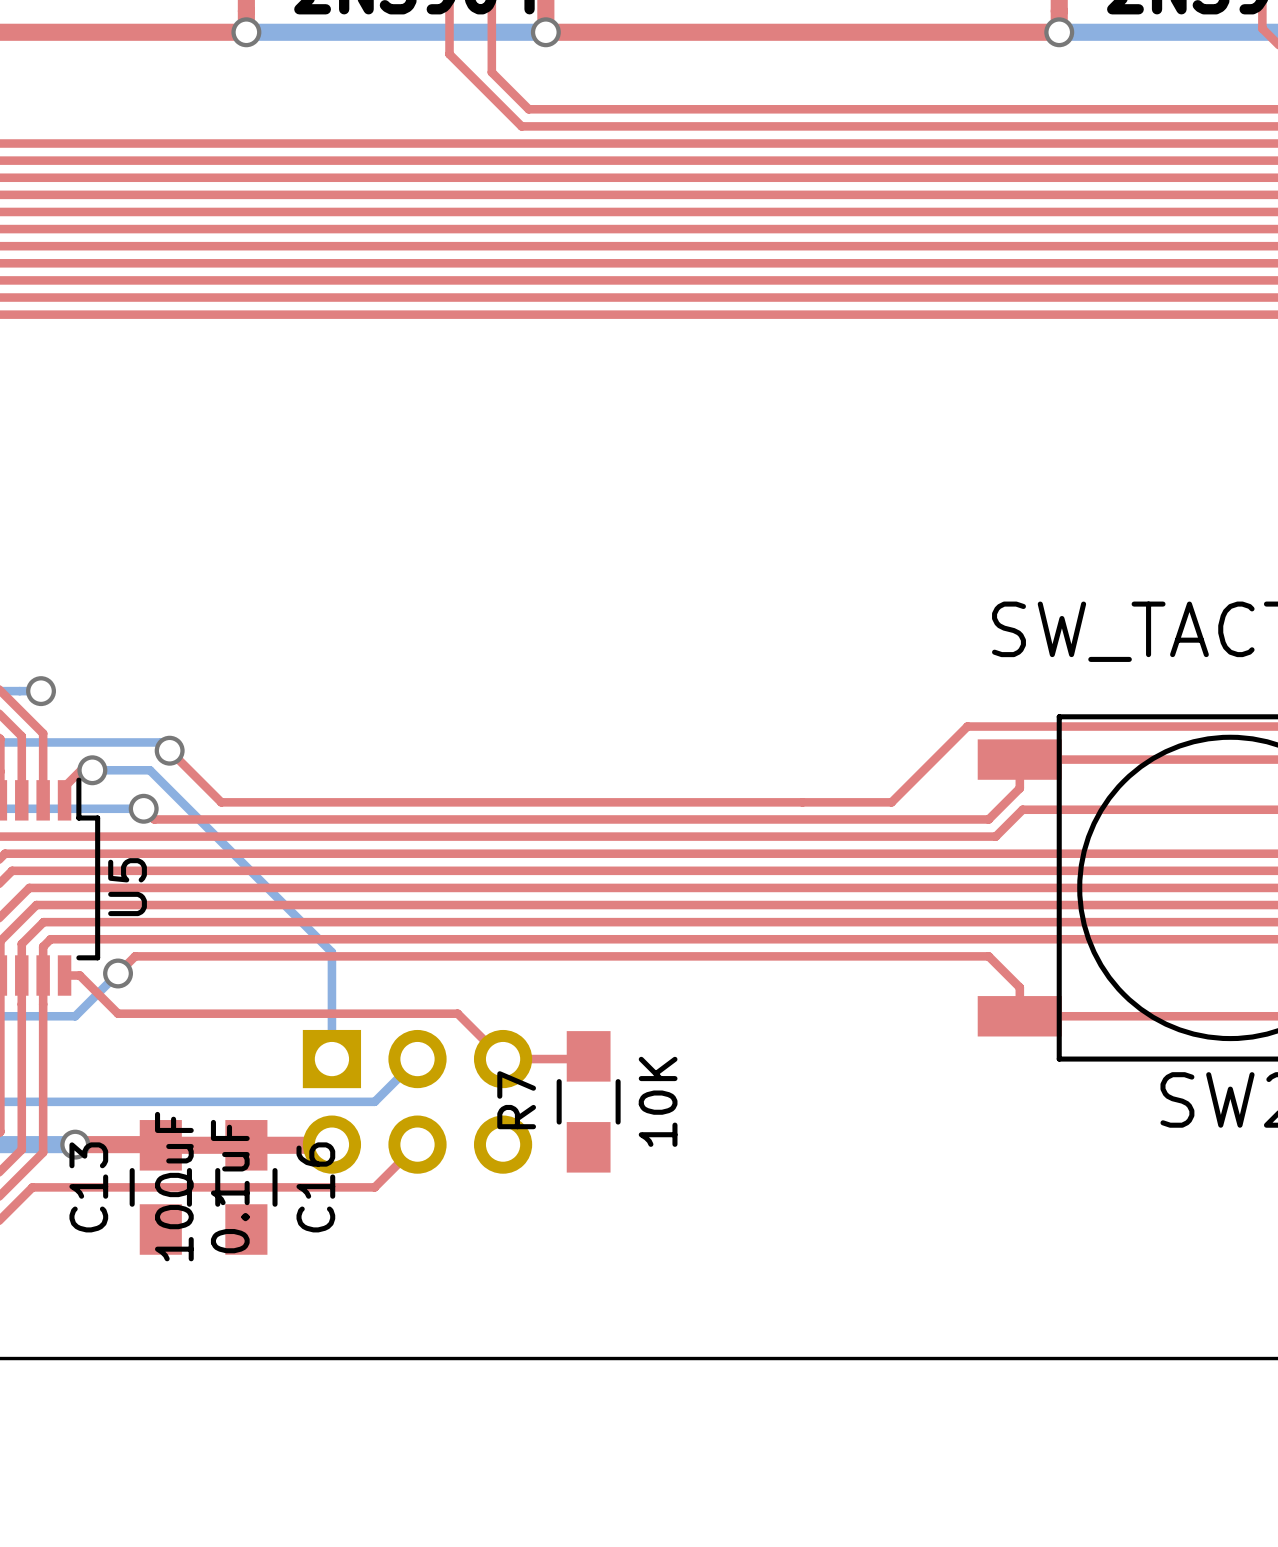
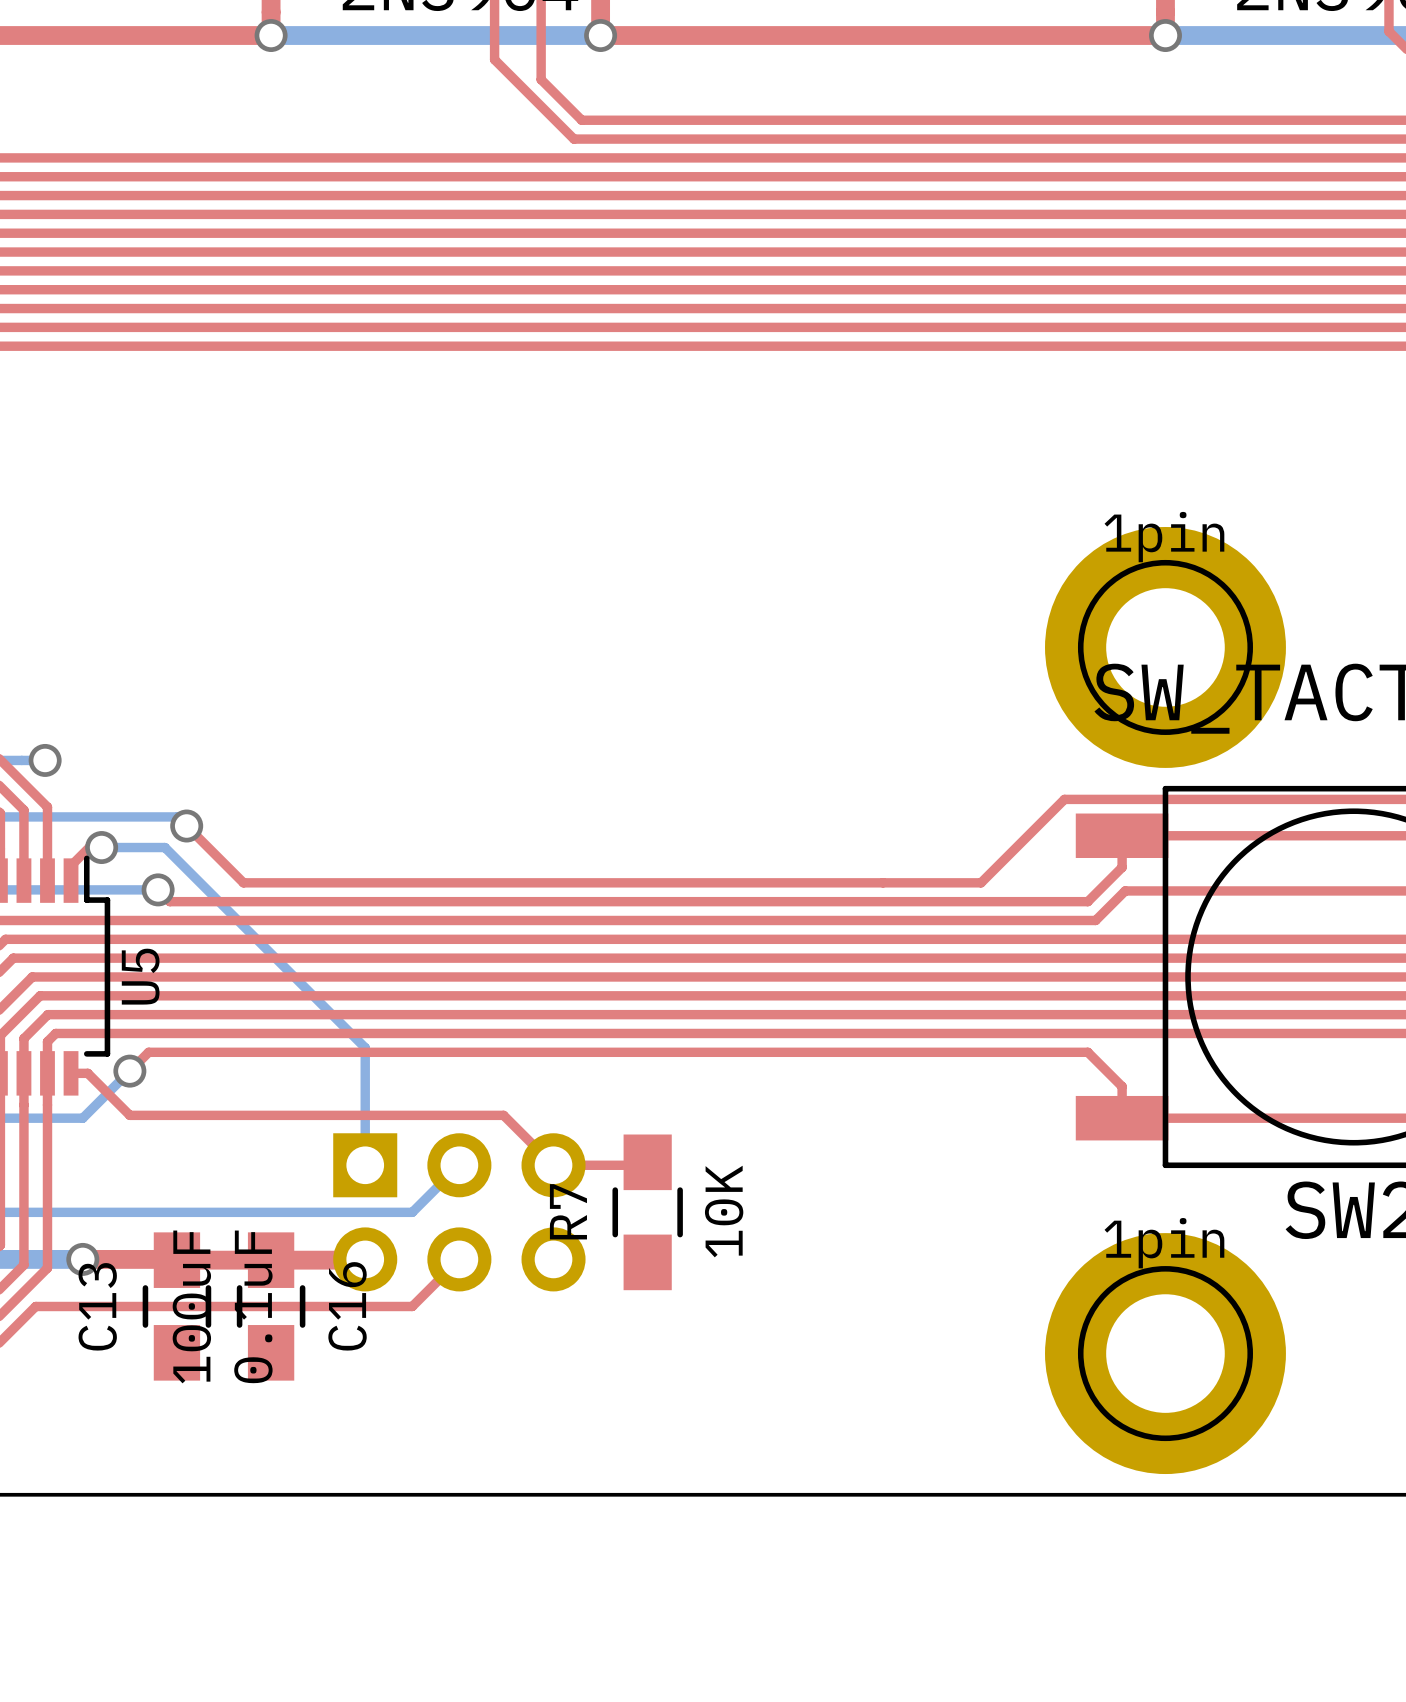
1pin: none -> (1165, 647)
1pin: none -> (1165, 1353)

